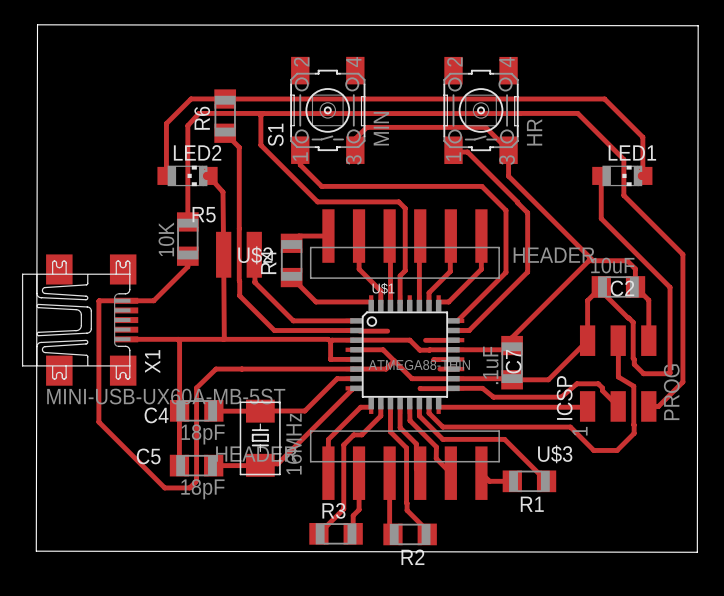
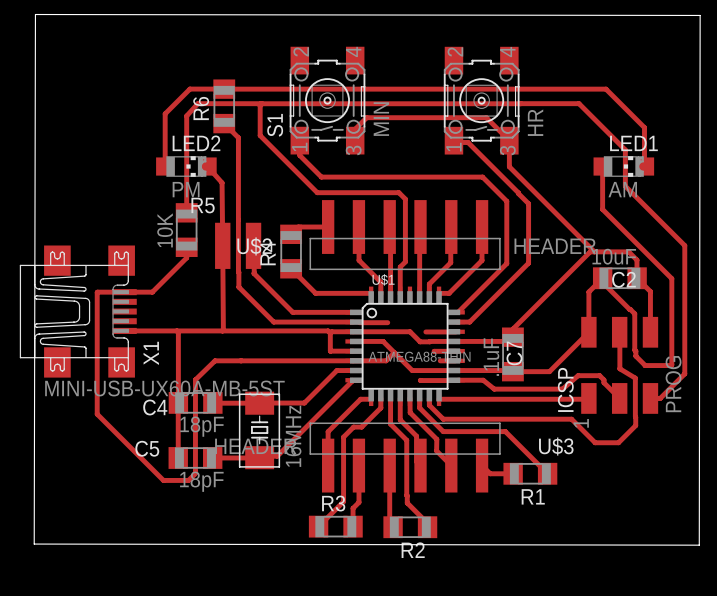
LED2 value: none -> PM (186, 189)
LED1 value: none -> AM (622, 189)

